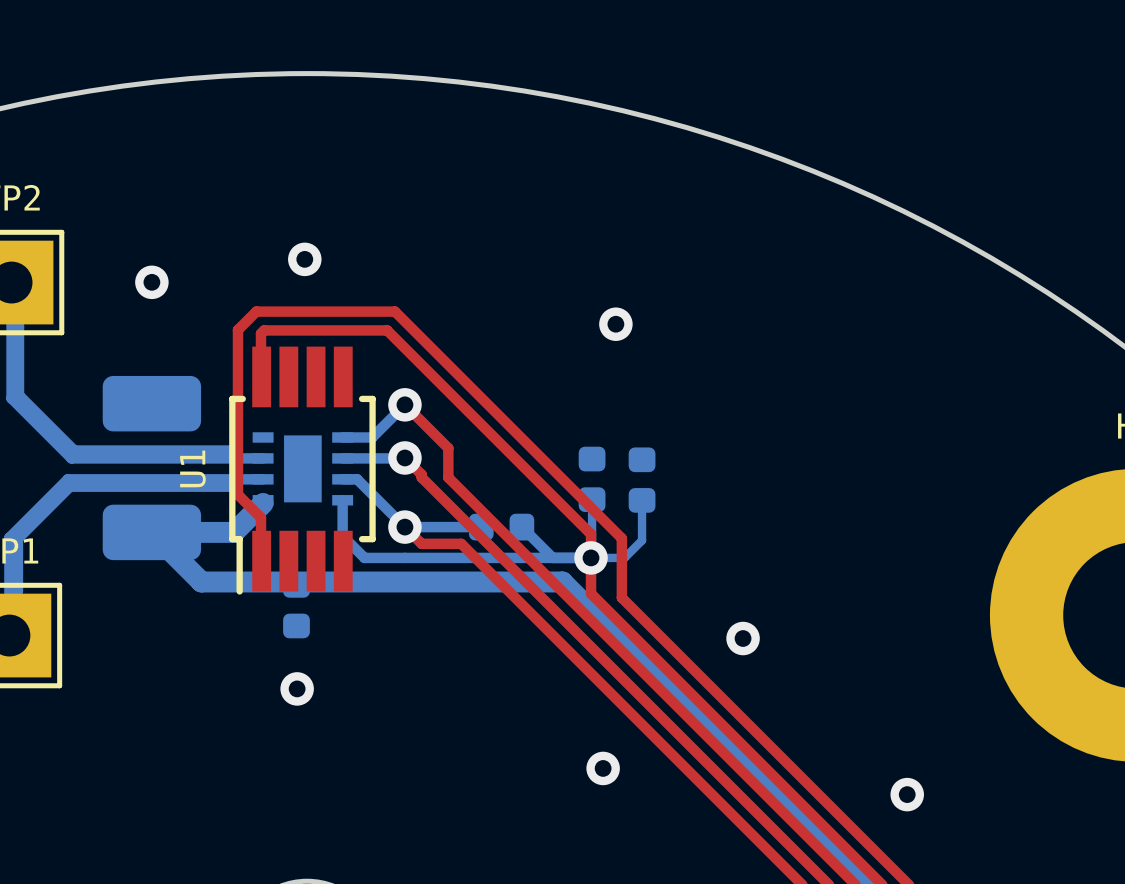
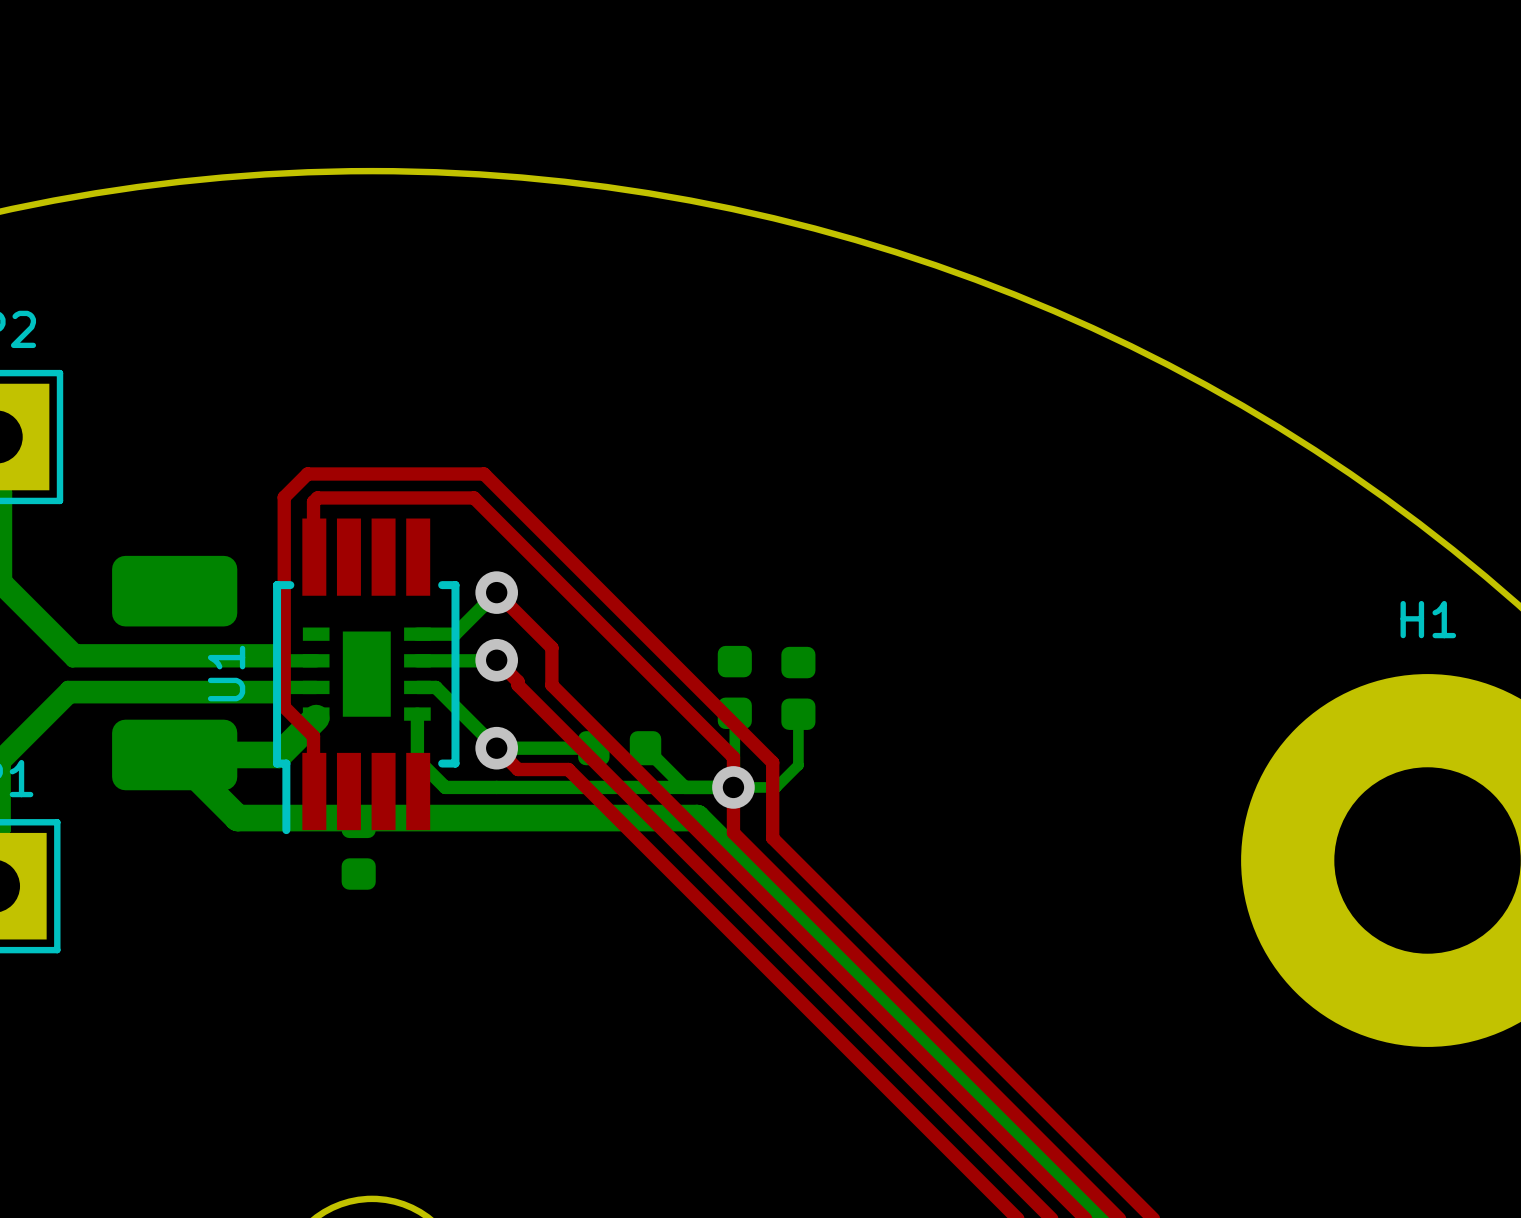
via: (304, 259) -> none
via: (151, 282) -> none
via: (615, 324) -> none
via: (743, 638) -> none
via: (297, 688) -> none
via: (603, 768) -> none
via: (907, 794) -> none

